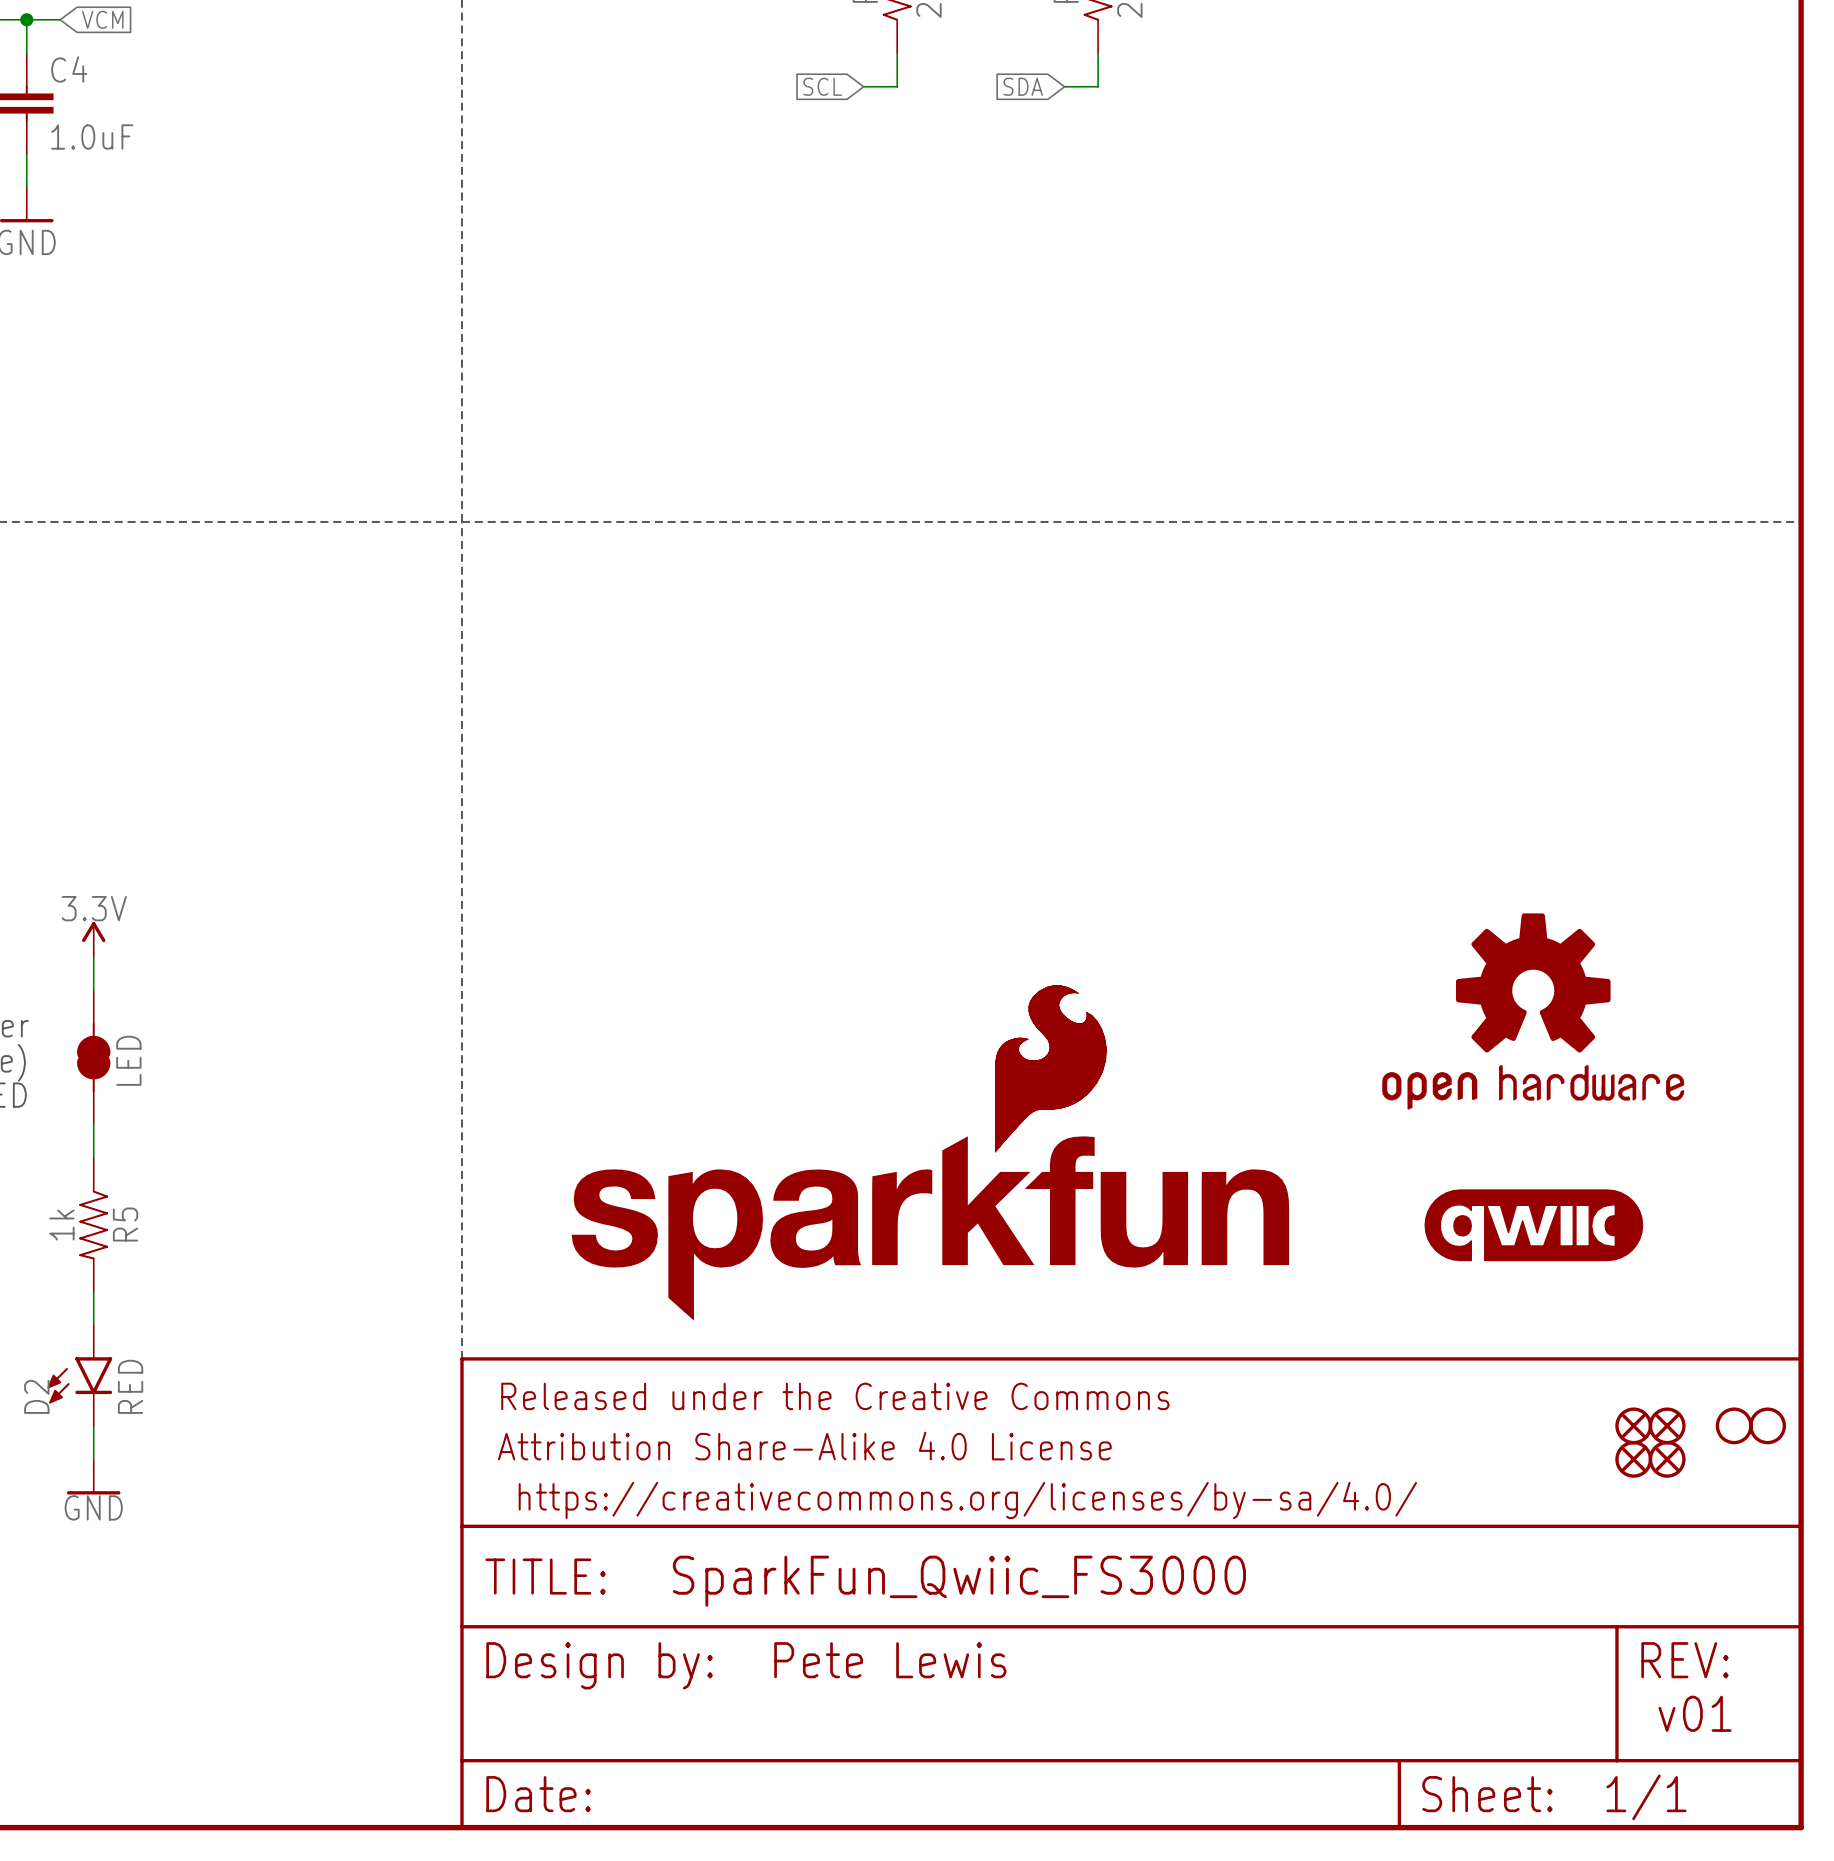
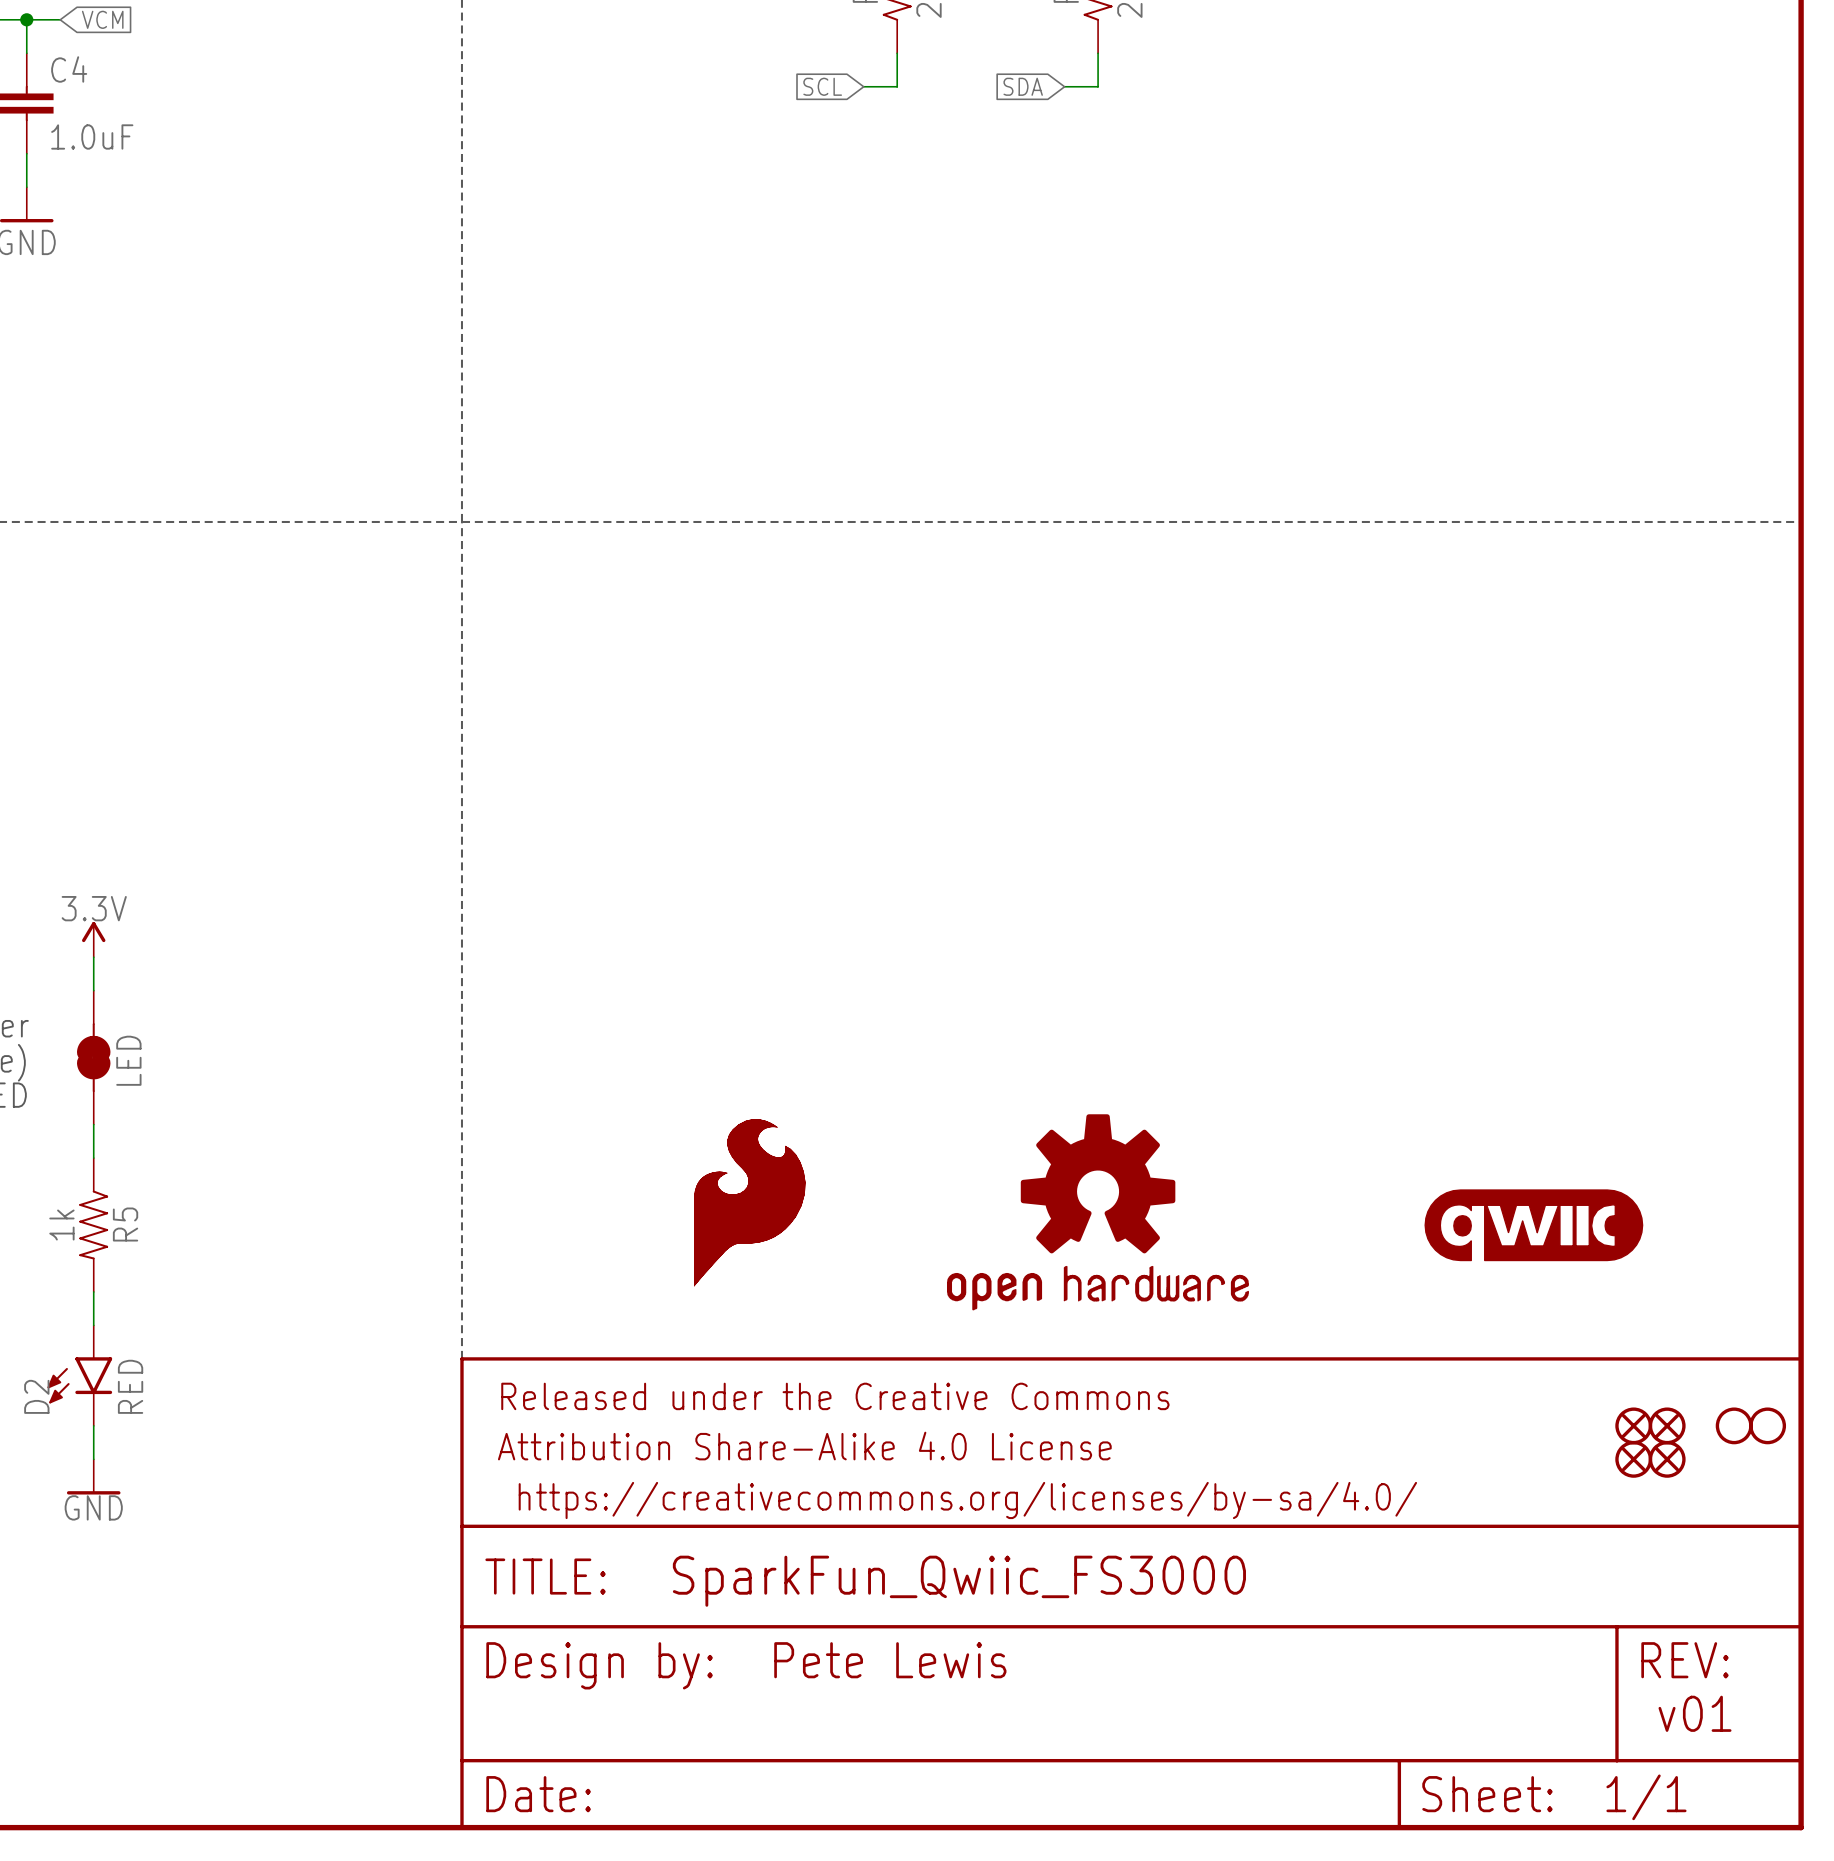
part: (1533, 1011) -> none
part: (930, 1152) -> none
part: none -> (749, 1202)
part: none -> (1097, 1212)

